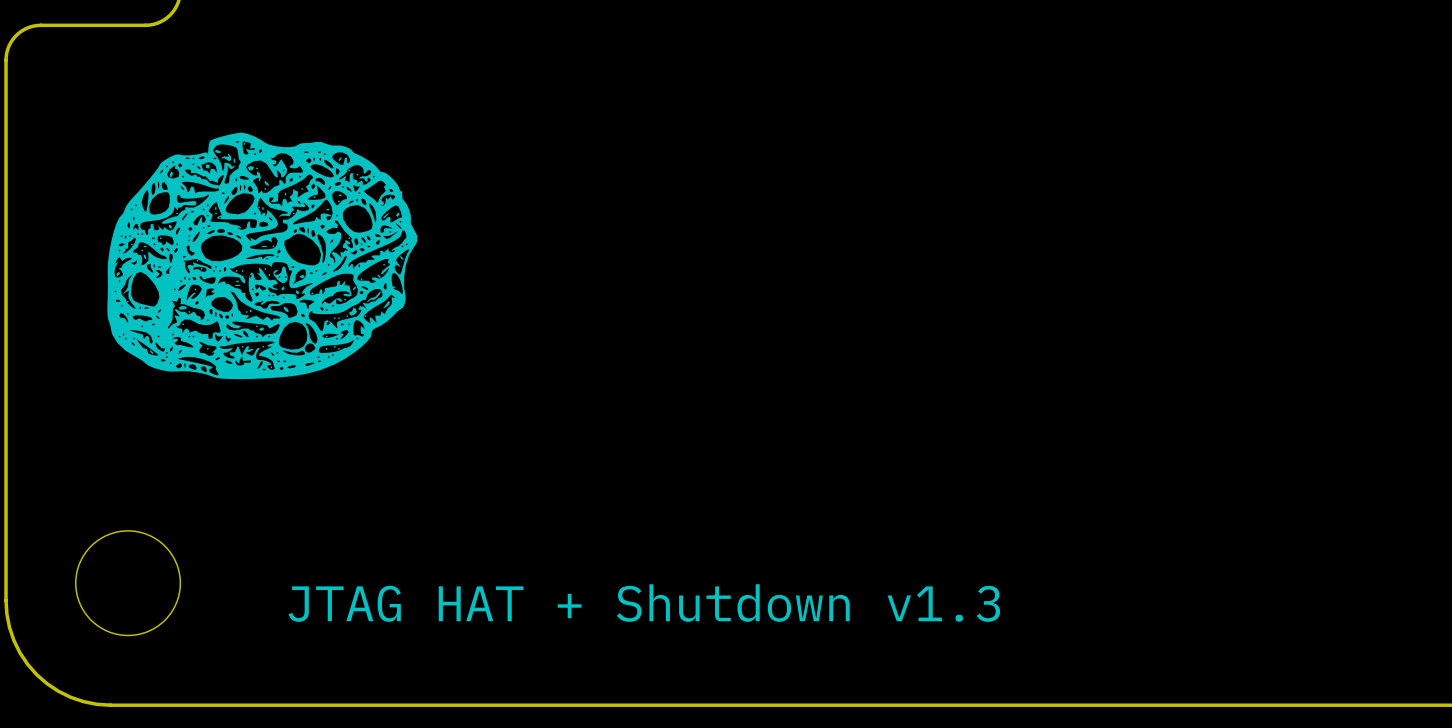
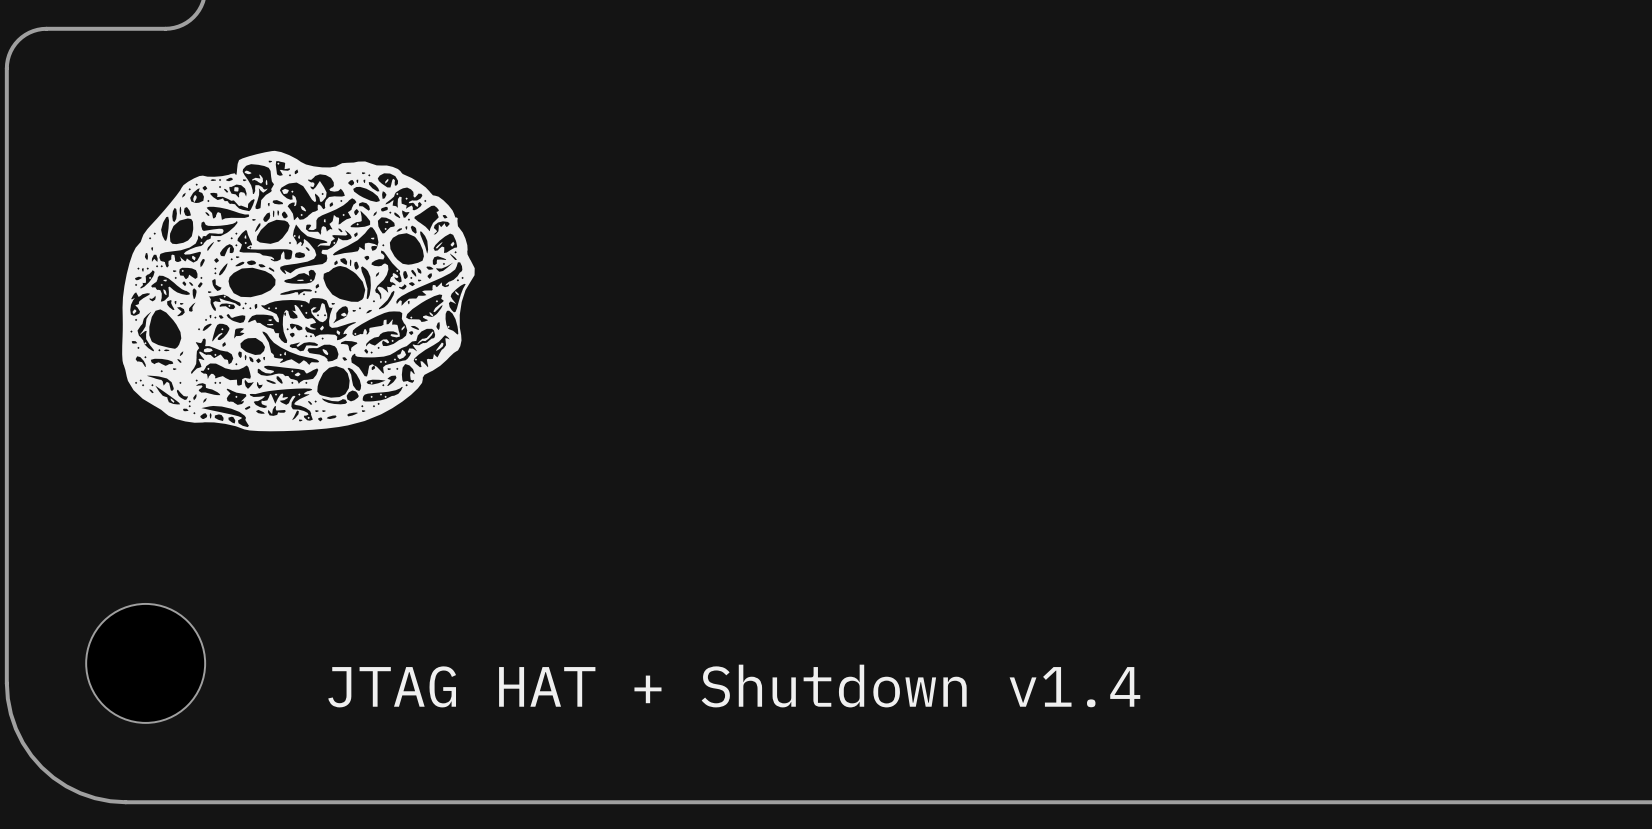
text: JTAG HAT + Shutdown v1.3 (644, 603) -> JTAG HAT + Shutdown v1.4 (734, 686)

